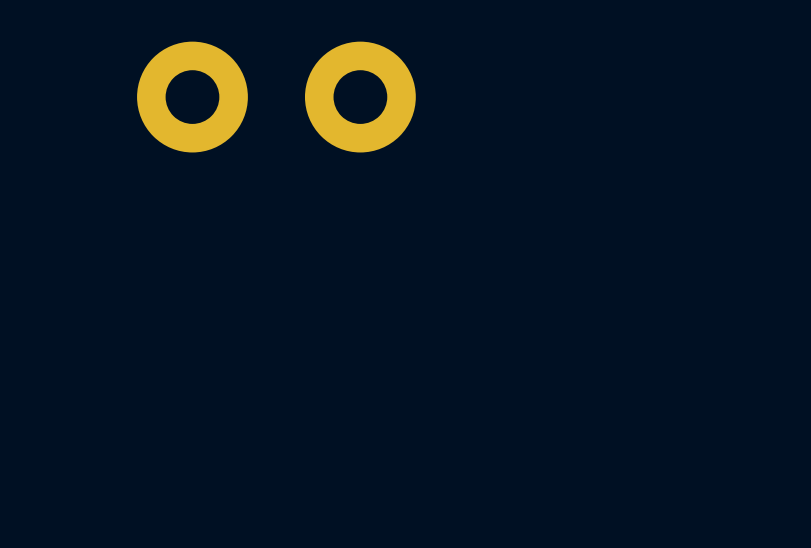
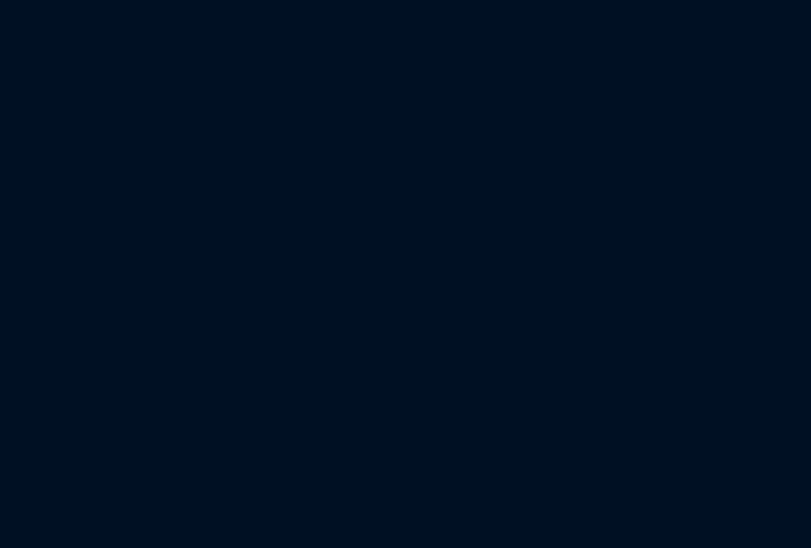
part: (276, 97) -> none

